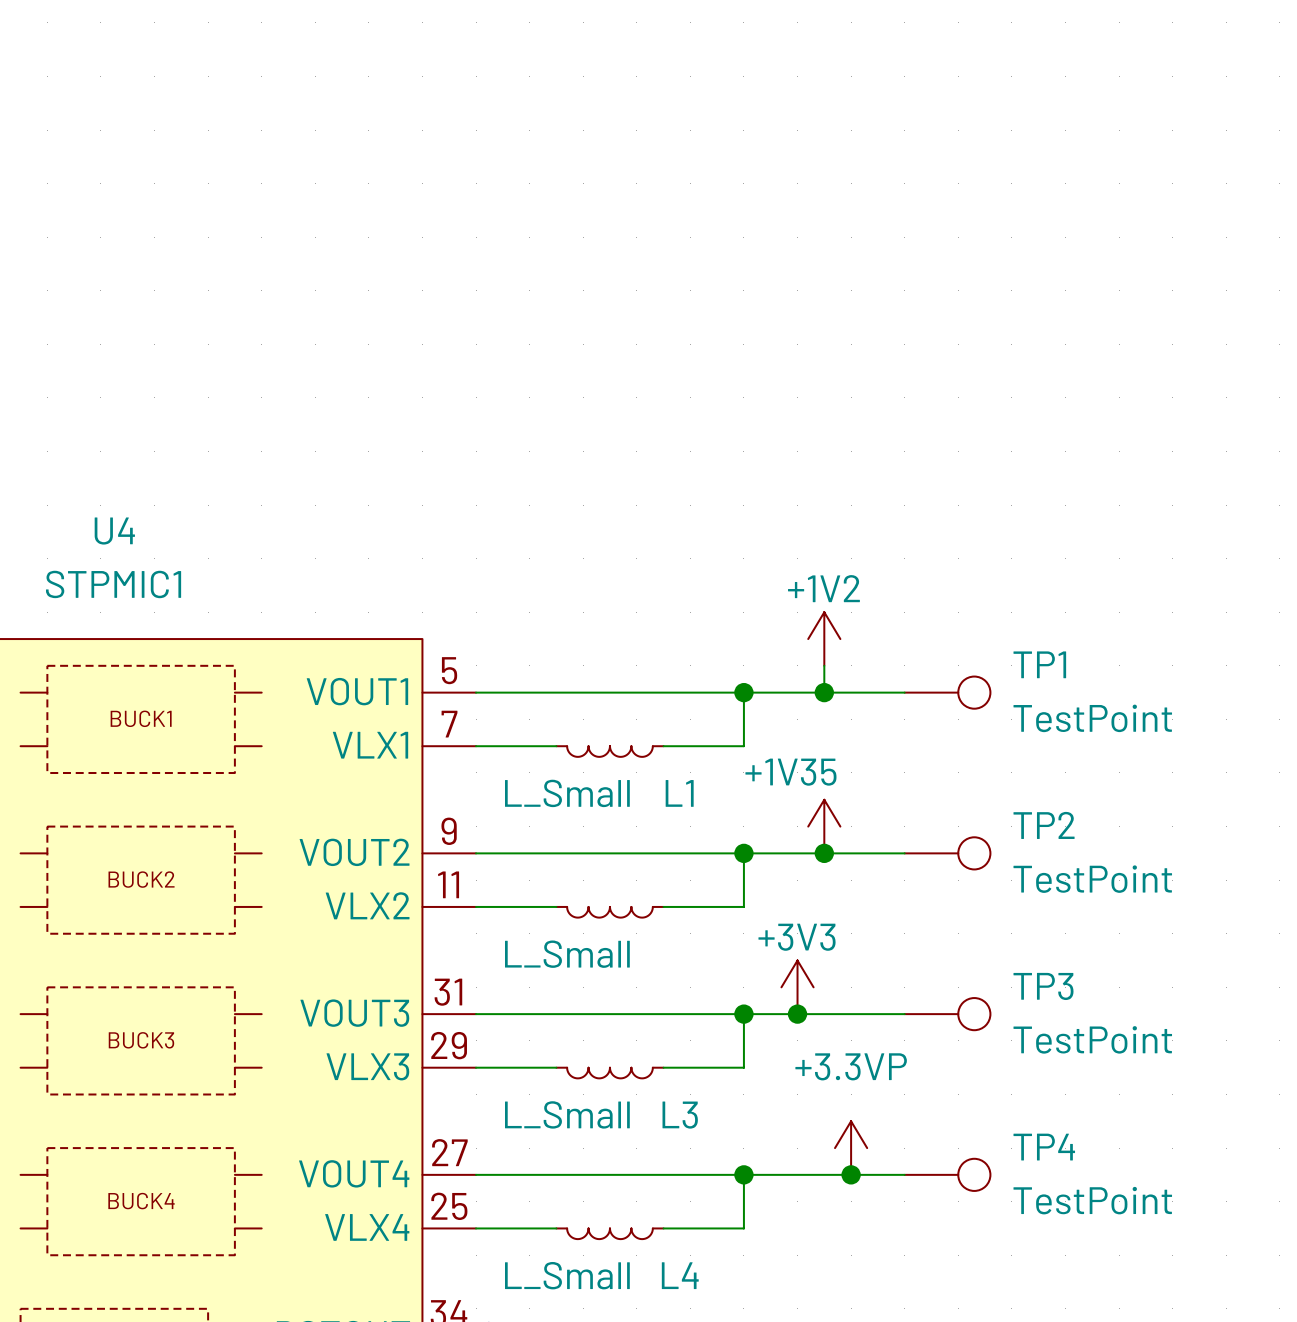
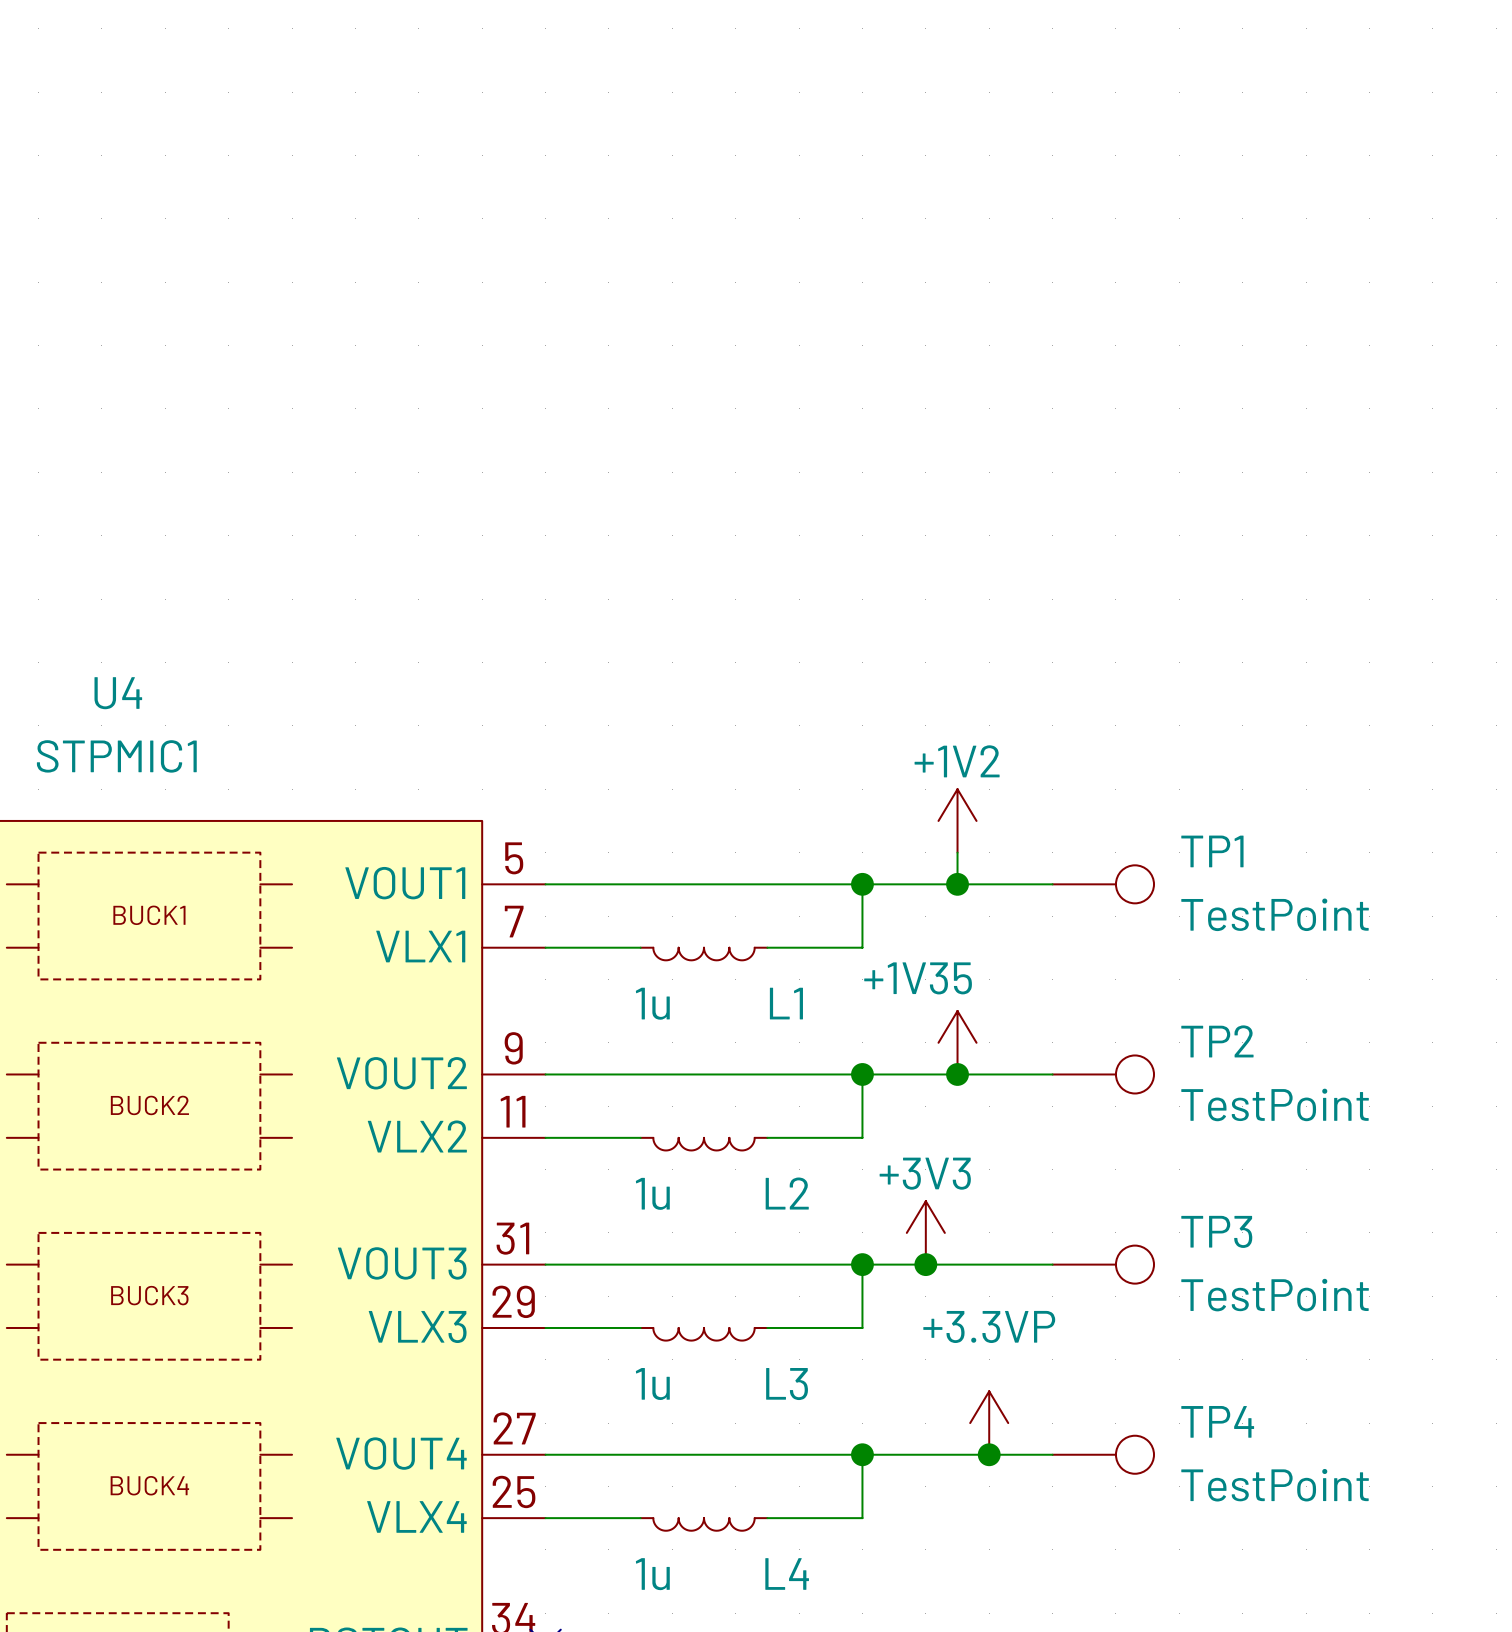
L1 value: L_Small (567, 793) -> 1u (652, 1003)
L2 value: L_Small (567, 954) -> 1u (652, 1193)
L2 name: none -> L2 (787, 1193)
L3 value: L_Small (567, 1114) -> 1u (652, 1384)
L4 value: L_Small (567, 1275) -> 1u (652, 1574)

